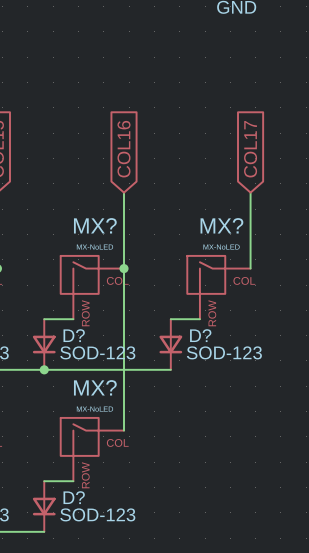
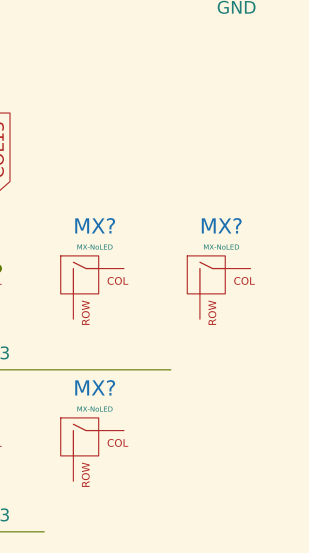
global label: COL16 (123, 149) -> none
global label: COL17 (250, 149) -> none
wire: (124, 192) (124, 430) -> none
wire: (250, 192) (250, 268) -> none
junction: (124, 268) -> none
wire: (44, 319) (73, 319) -> none
wire: (170, 319) (199, 319) -> none
D?: SOD-123 (44, 344) -> none
D?: SOD-123 (170, 344) -> none
junction: (44, 369) -> none
wire: (44, 481) (73, 481) -> none
D?: SOD-123 (44, 506) -> none

